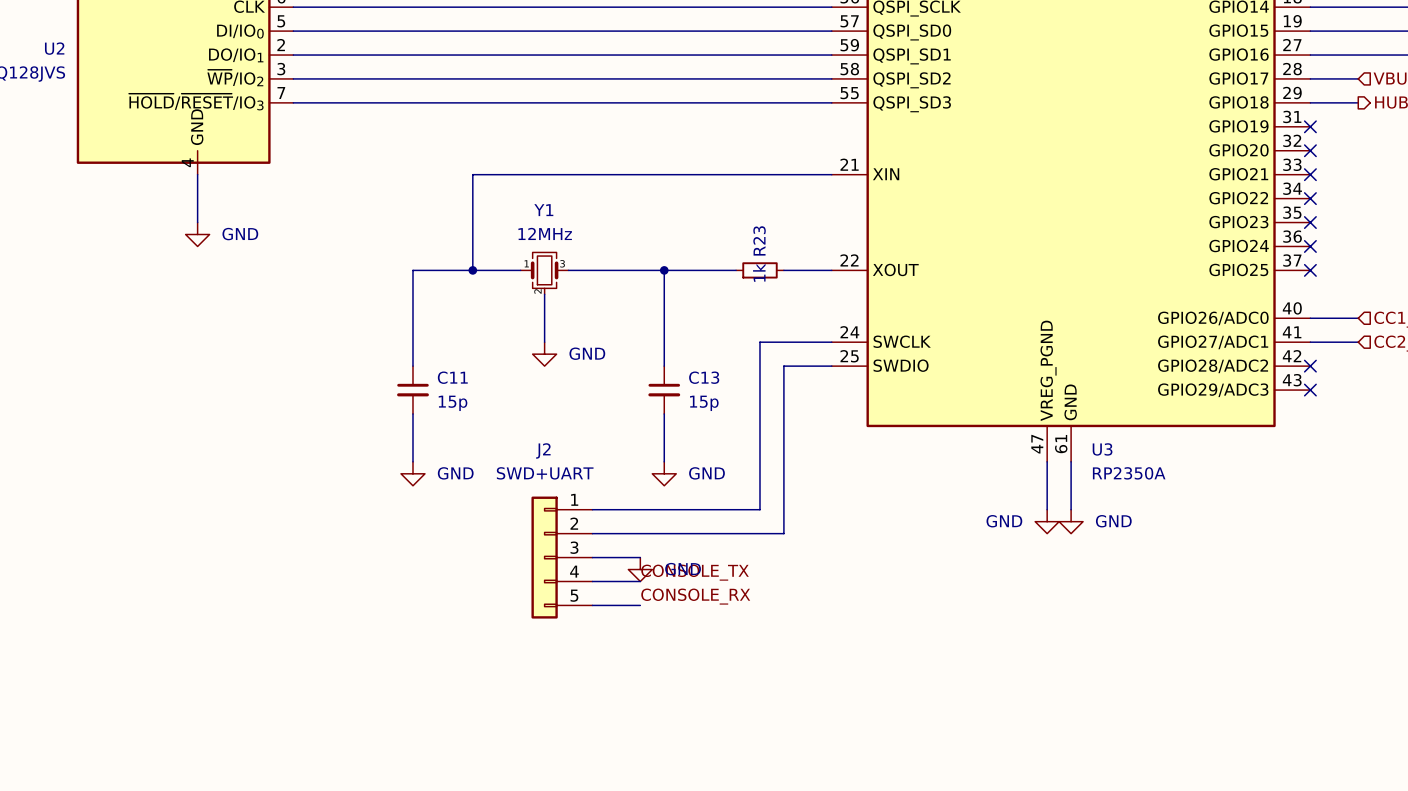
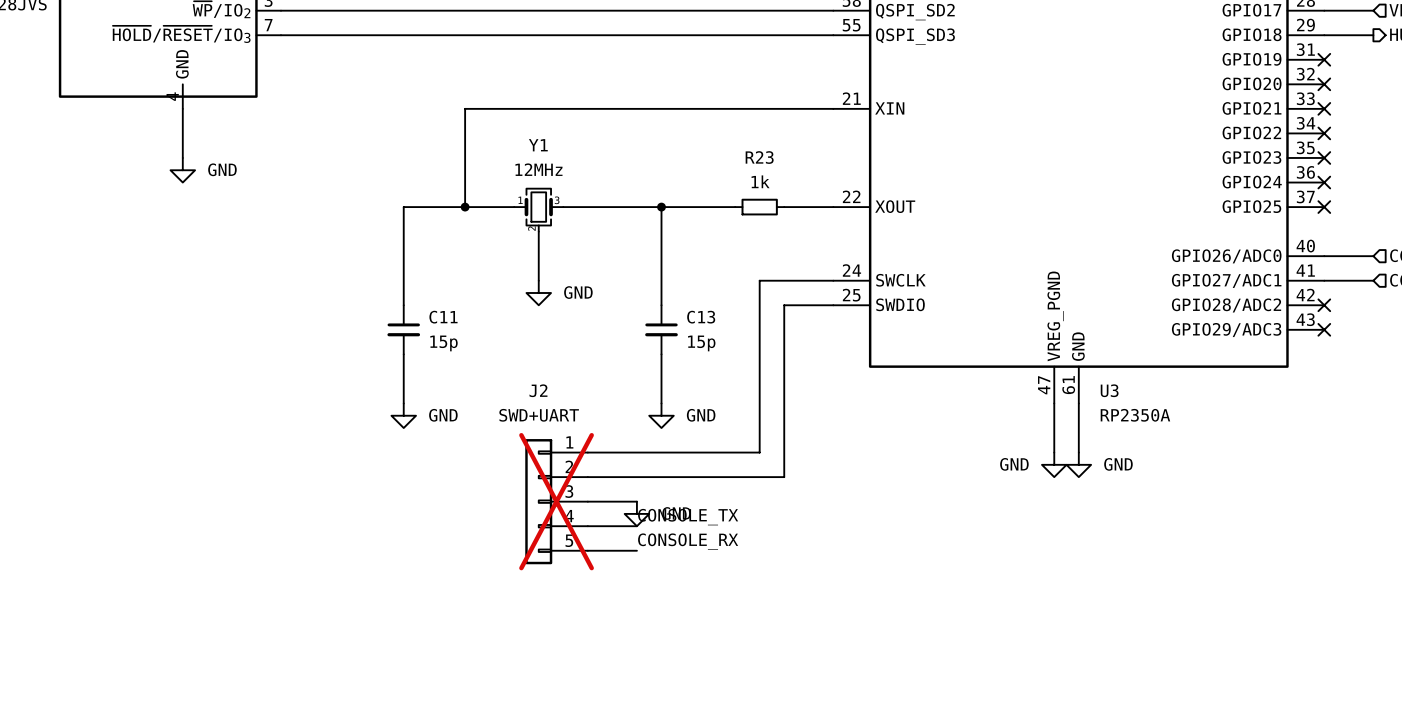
R23 name rotation: 0° (759, 240) -> 90° clockwise (759, 157)
R23 value rotation: 0° (759, 272) -> 90° clockwise (760, 181)
J2 do-not-place cross: none -> (556, 501)

